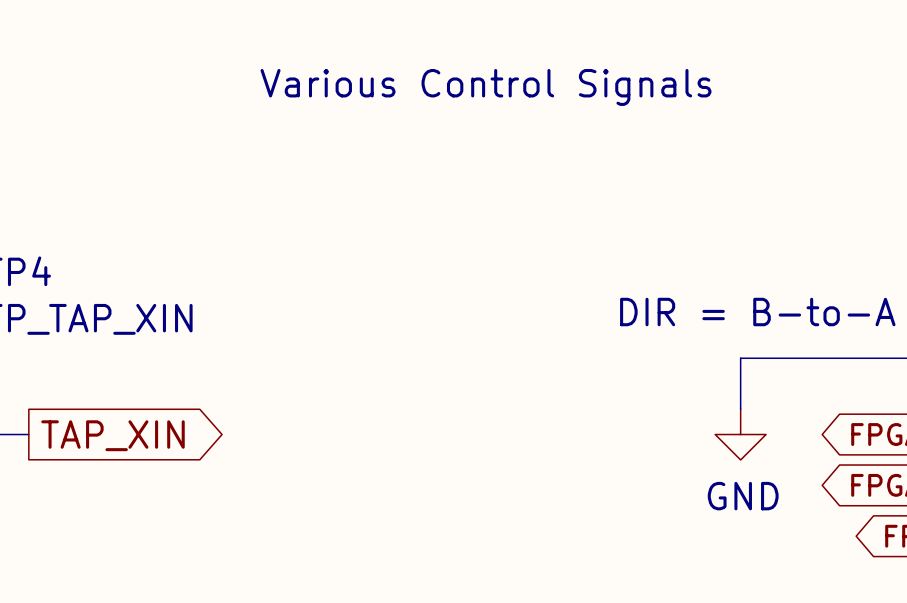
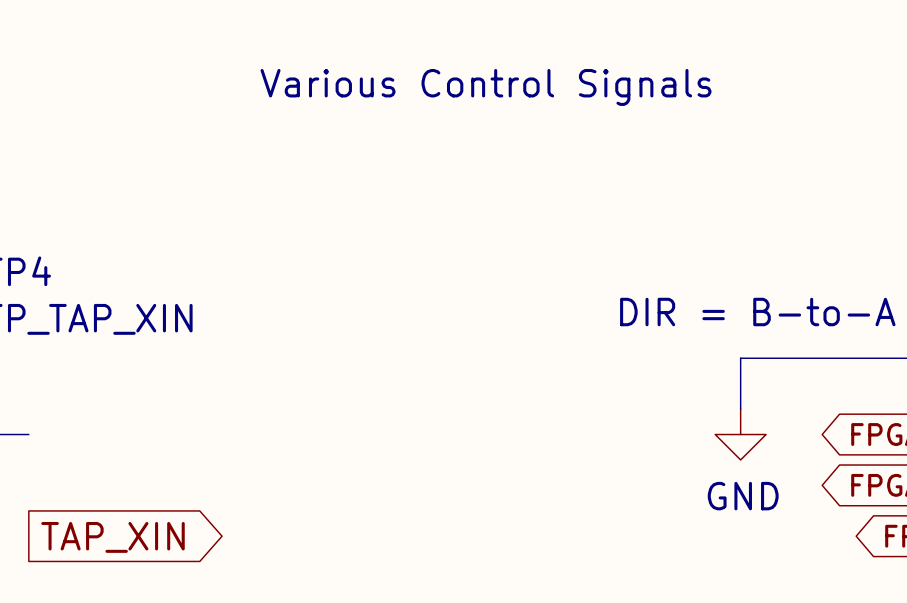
global label position: TAP_XIN (113, 435) -> TAP_XIN (113, 537)

